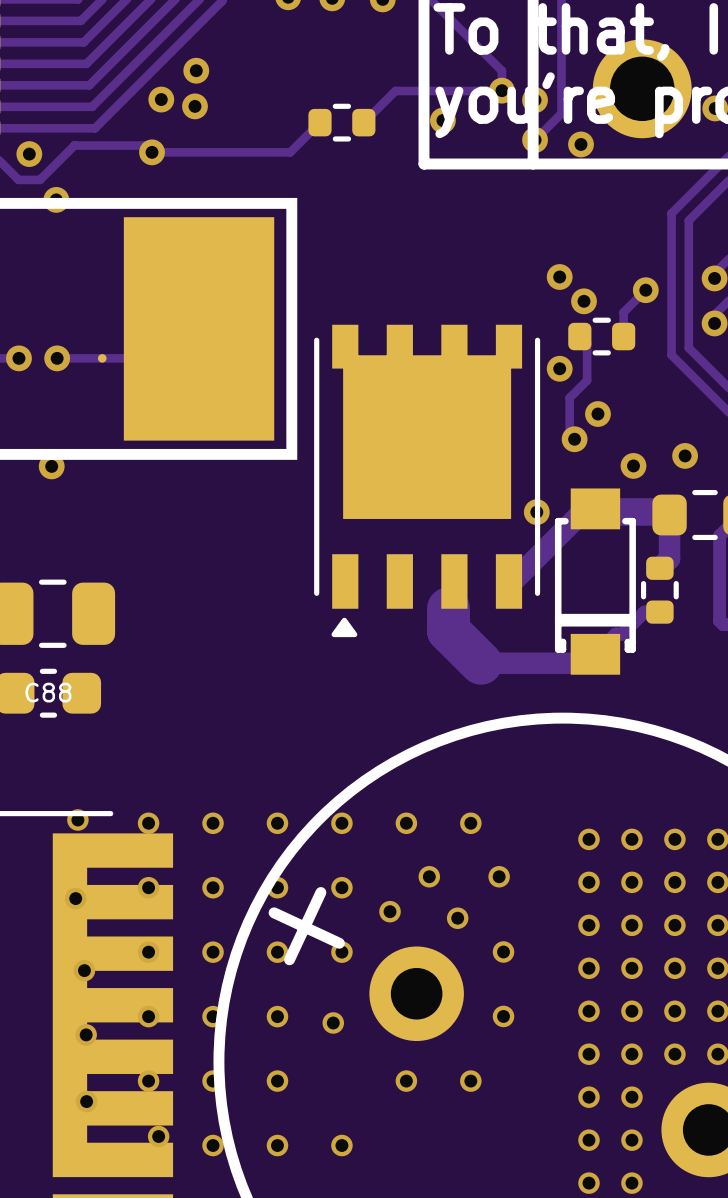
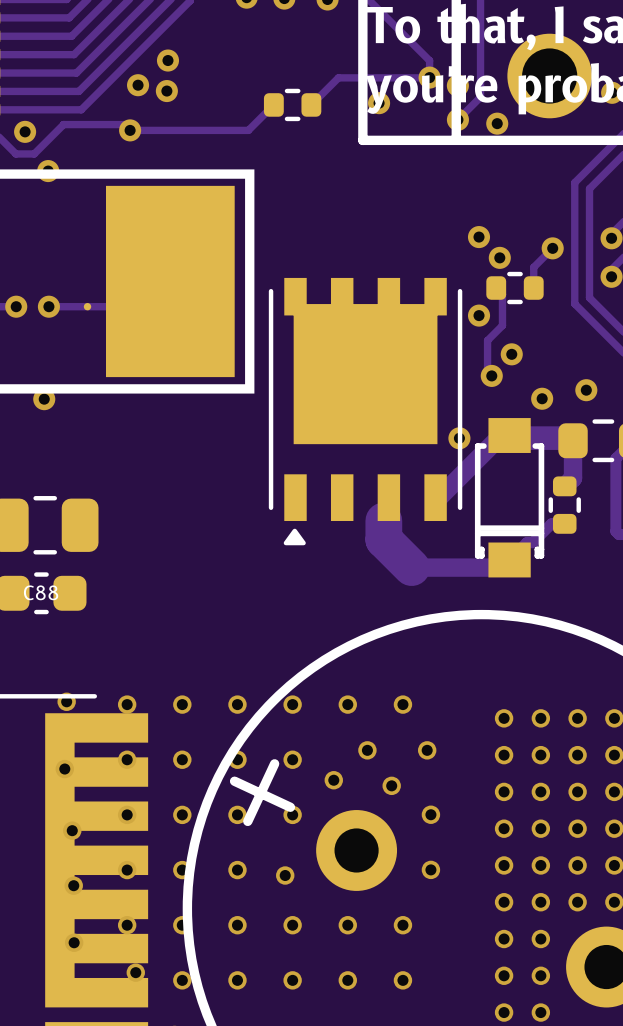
via: none -> (292, 925)
via: none -> (347, 980)
via: none -> (402, 980)

